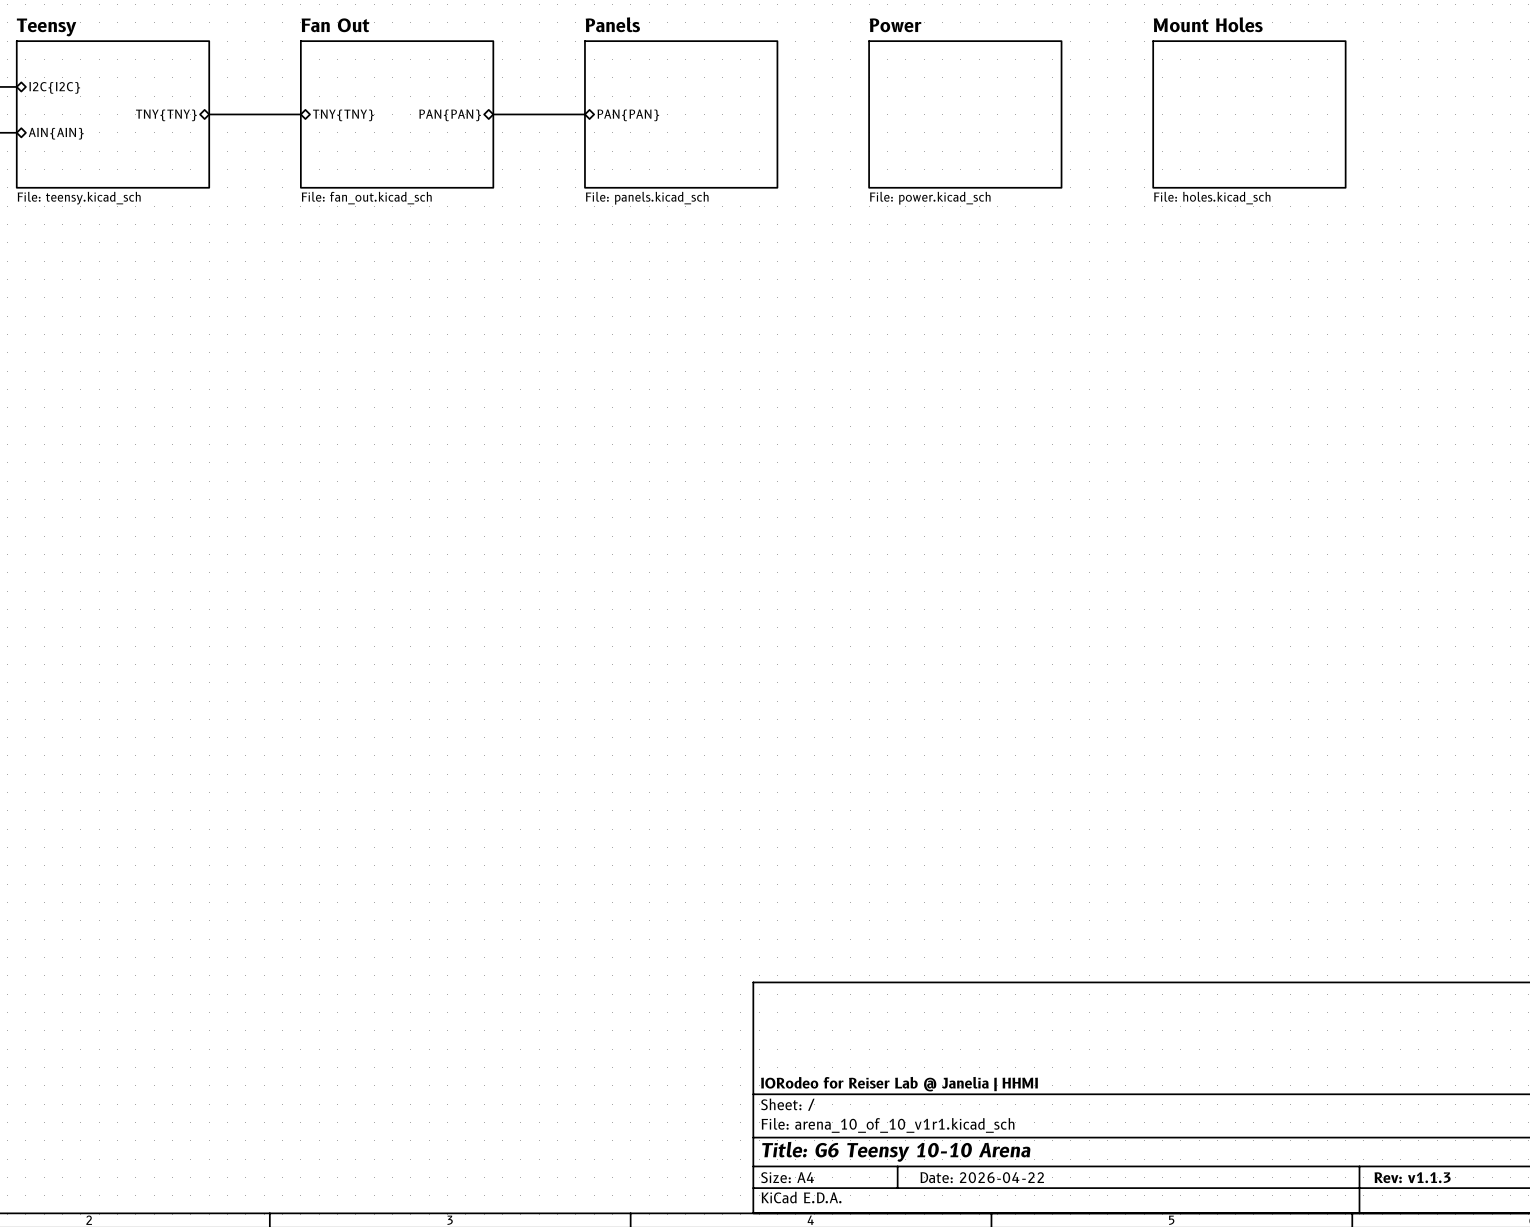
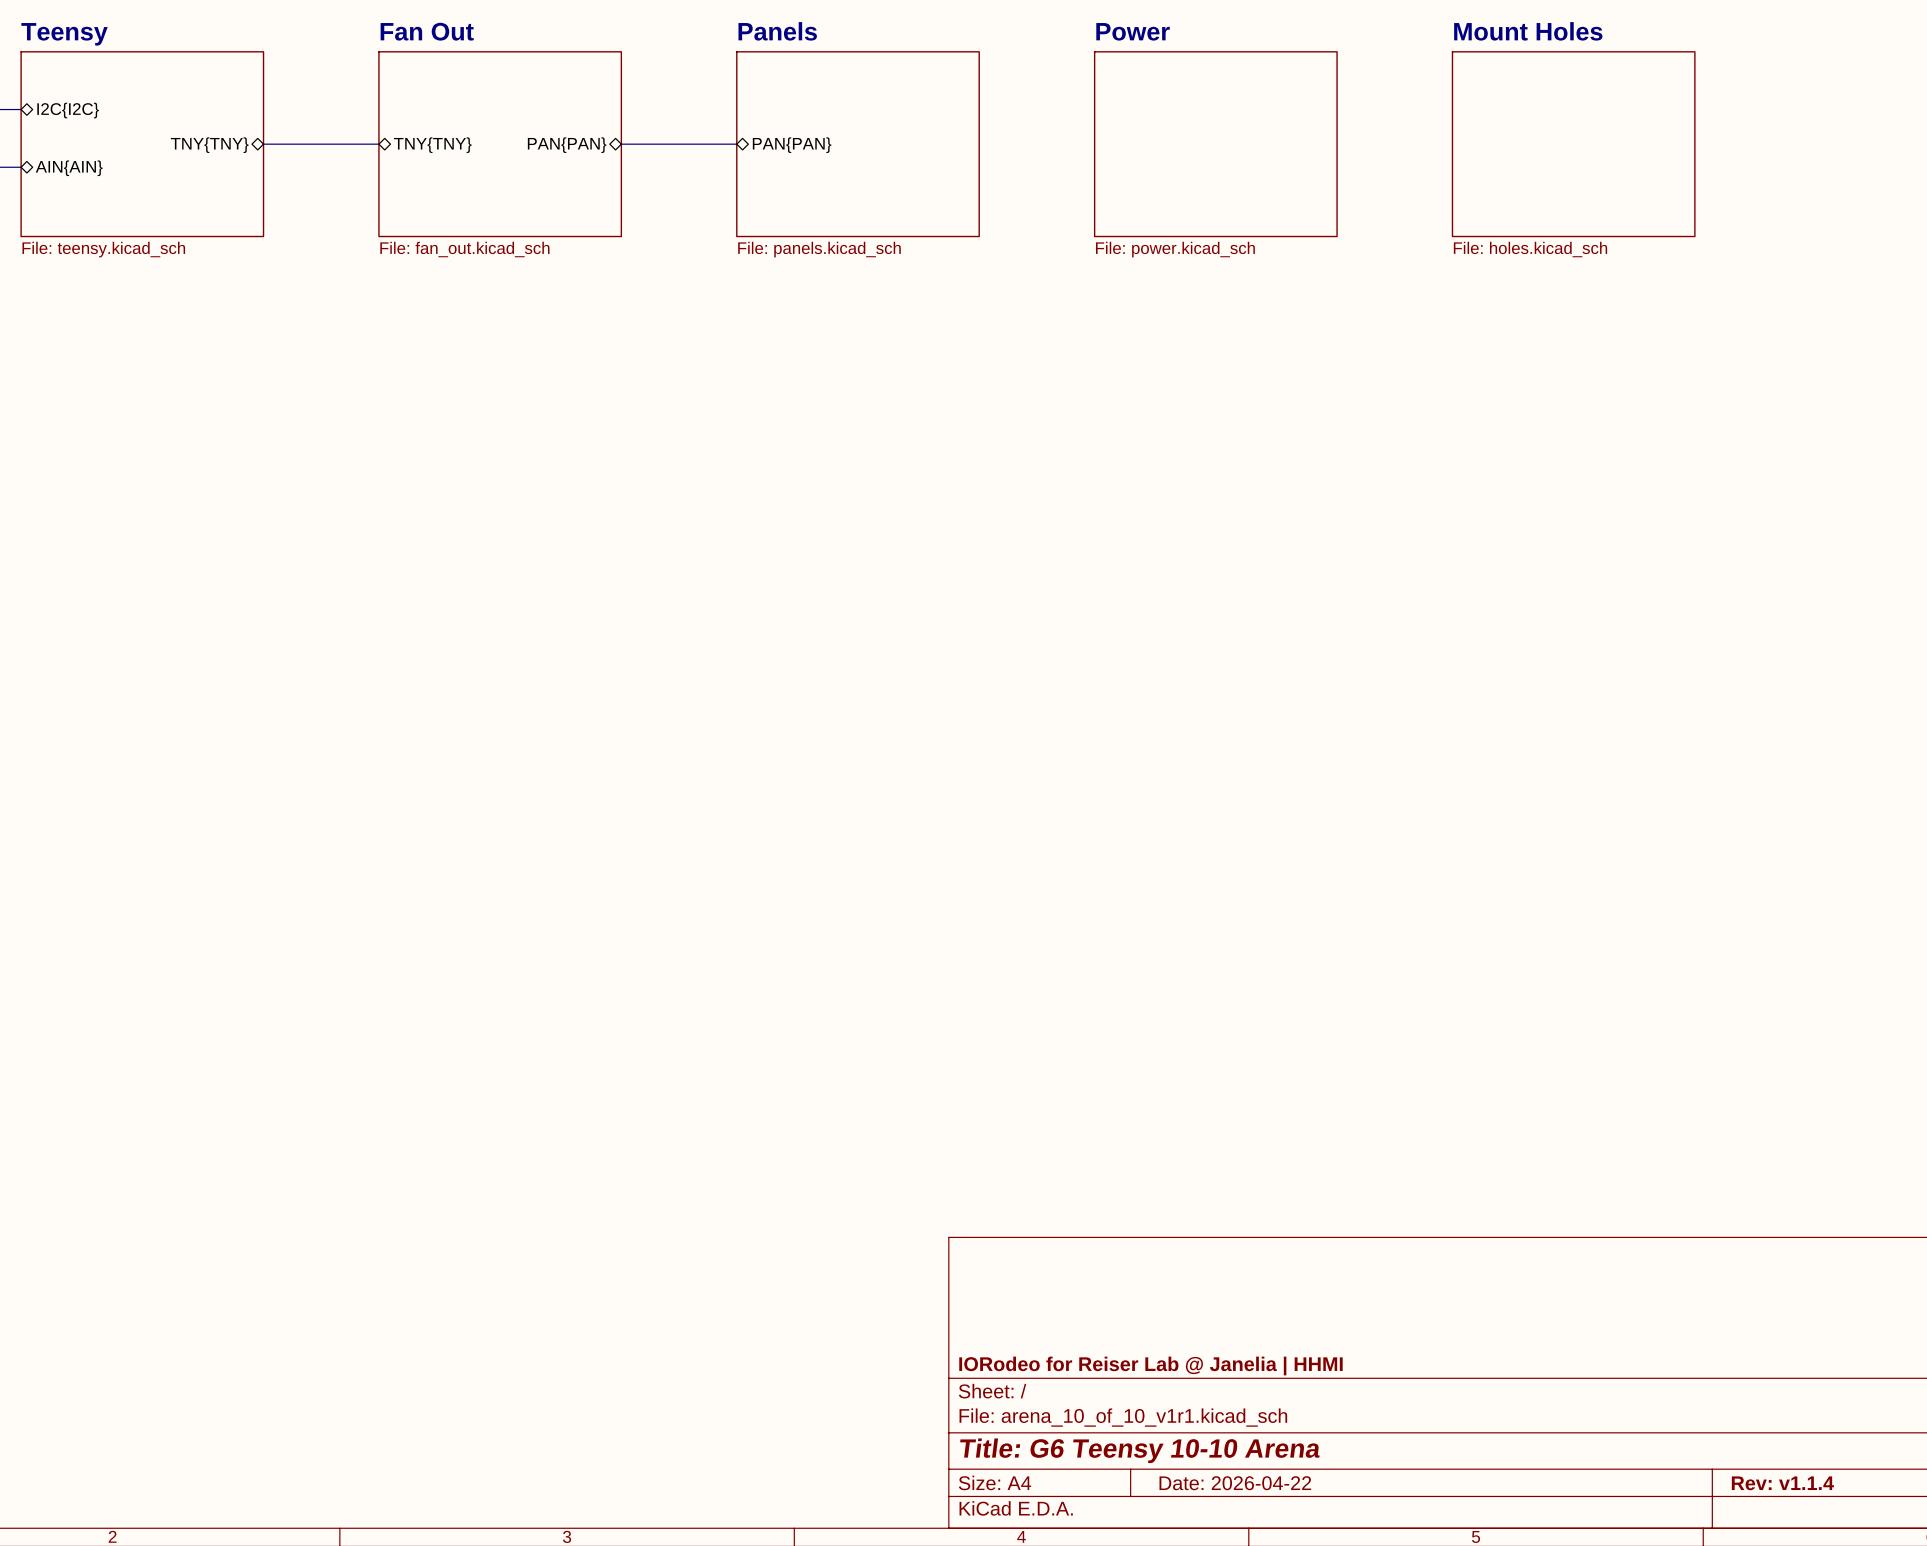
title block: Rev: v1.1.3 (1412, 1177) -> Rev: v1.1.4 (1782, 1483)

